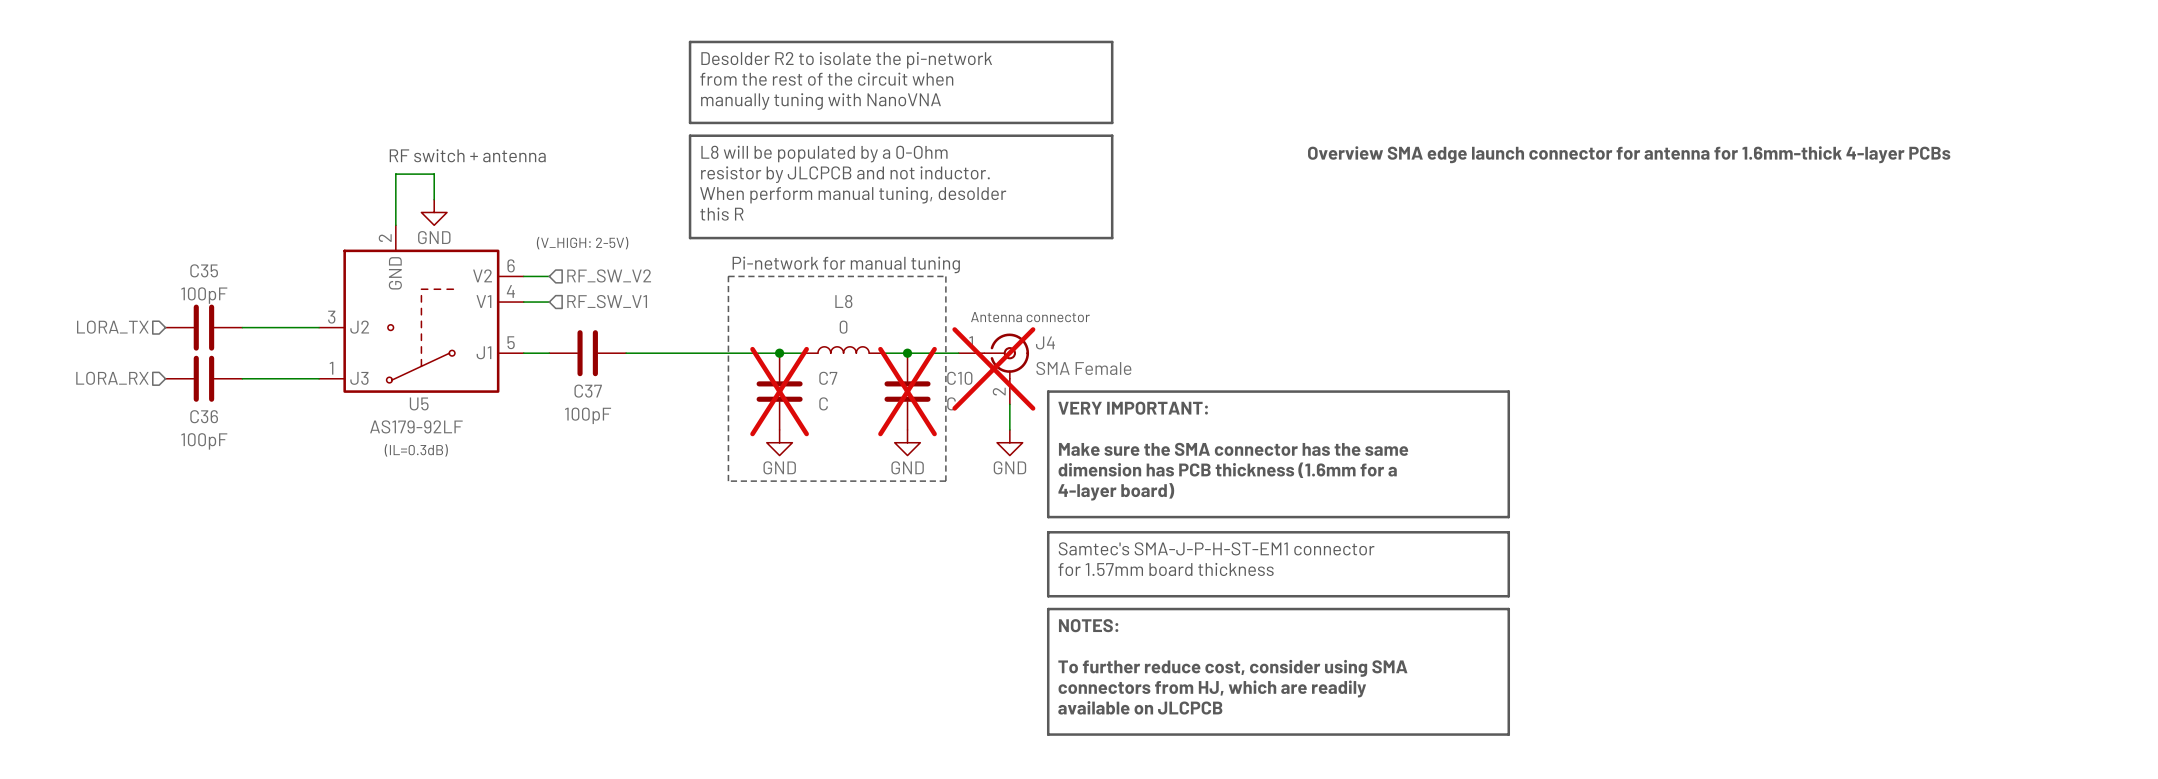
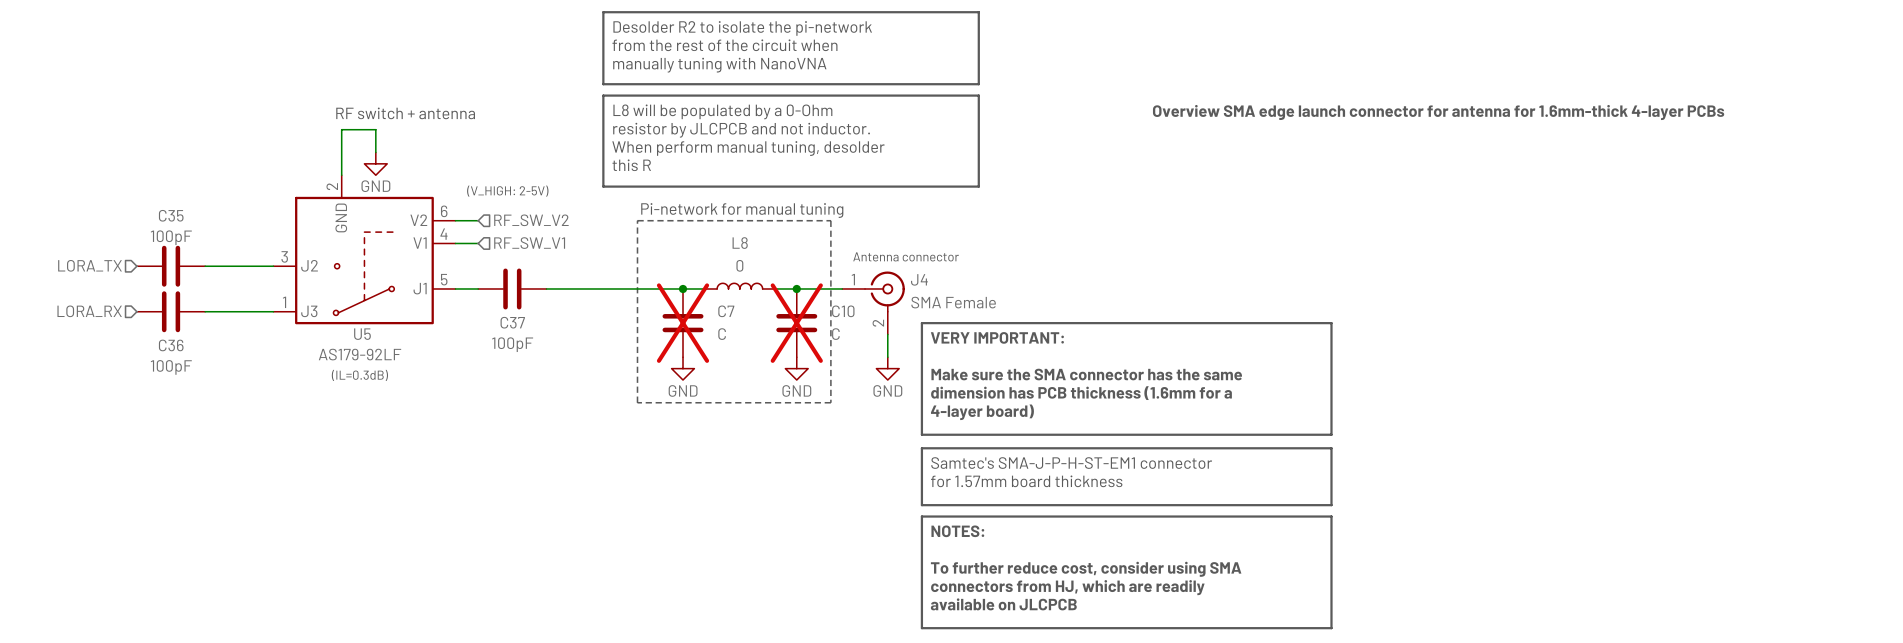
J4 do-not-place cross: (993, 368) -> none

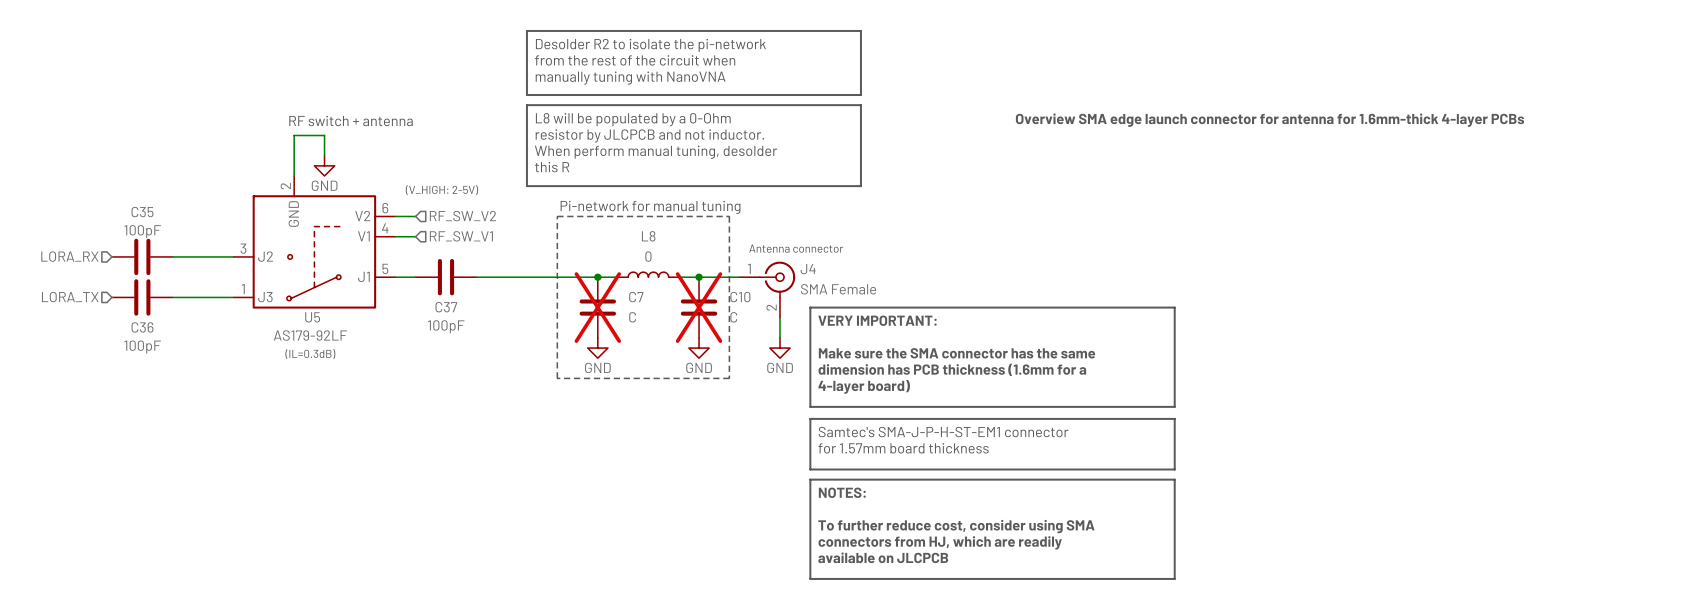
hierarchical label: LORA_TX (89, 265) -> LORA_RX (69, 256)
hierarchical label: LORA_RX (89, 311) -> LORA_TX (70, 297)

